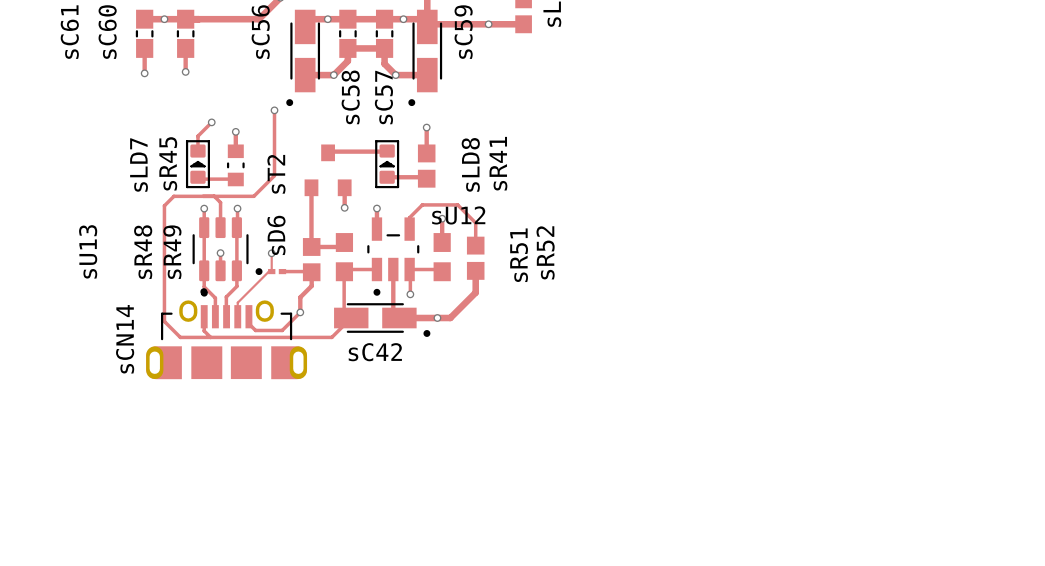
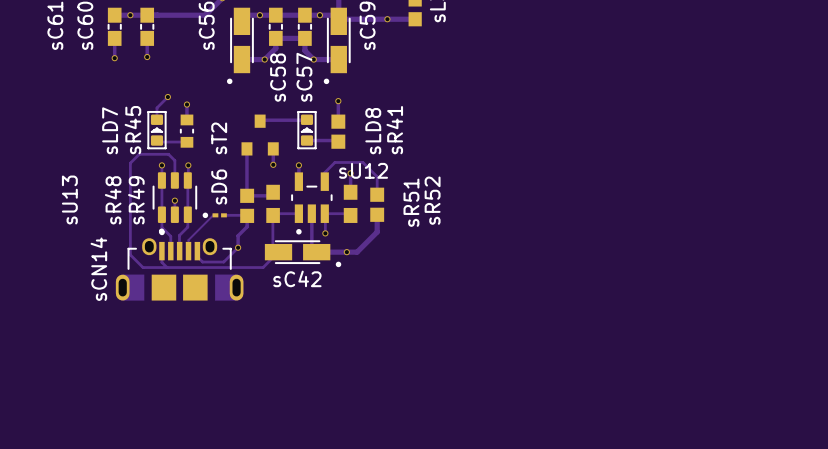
track: (274, 110) (274, 175) (253, 196) (173, 196) -> (169, 155) (137, 155)
via: (274, 110) -> none
track: (271, 253) (271, 271) -> none
via: (271, 253) -> none

